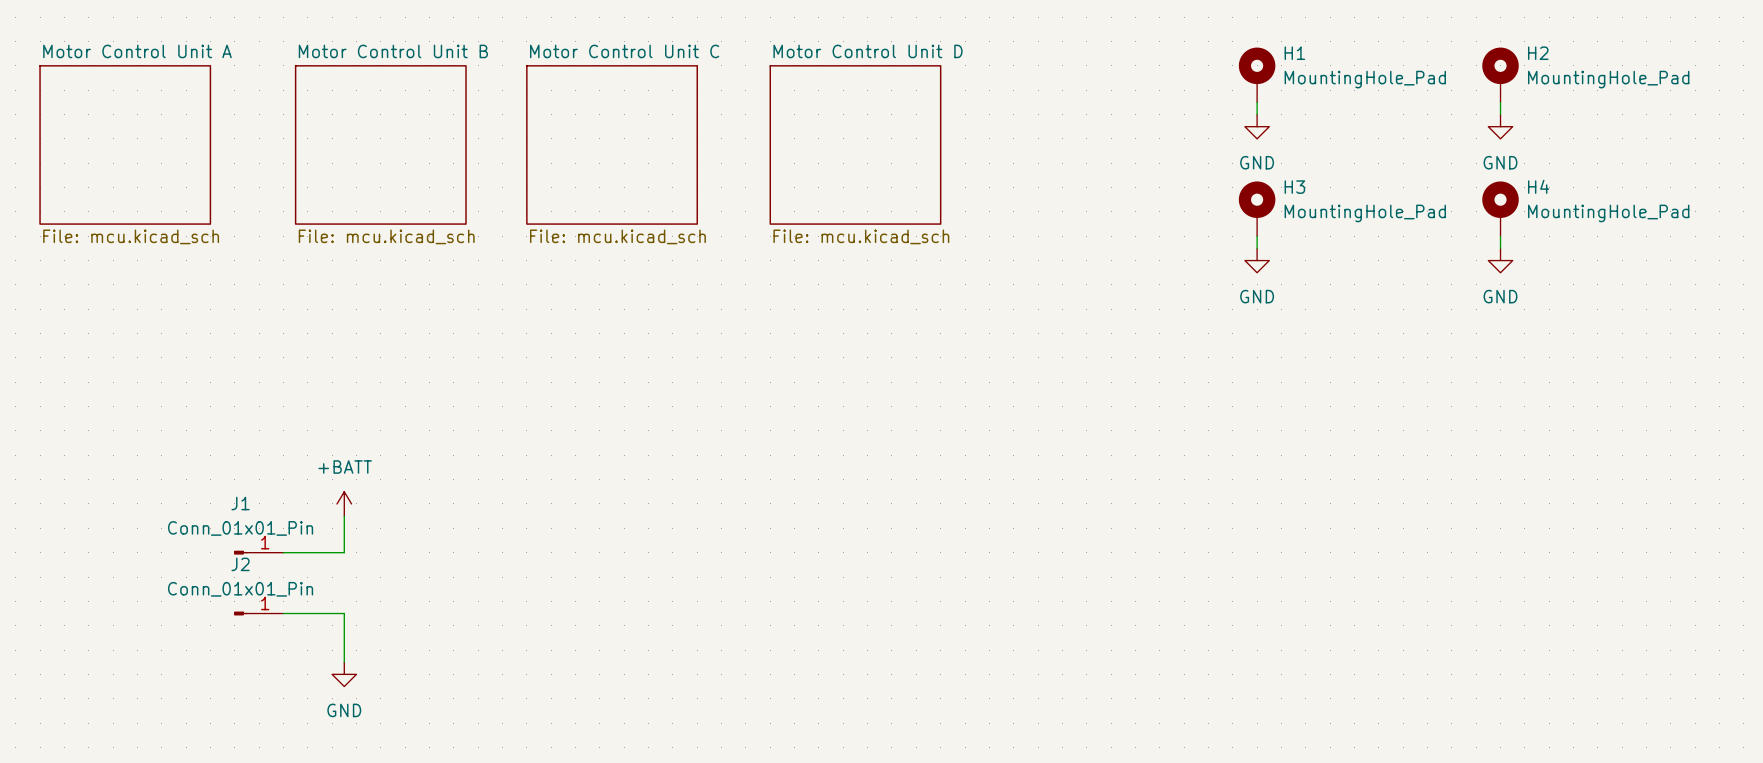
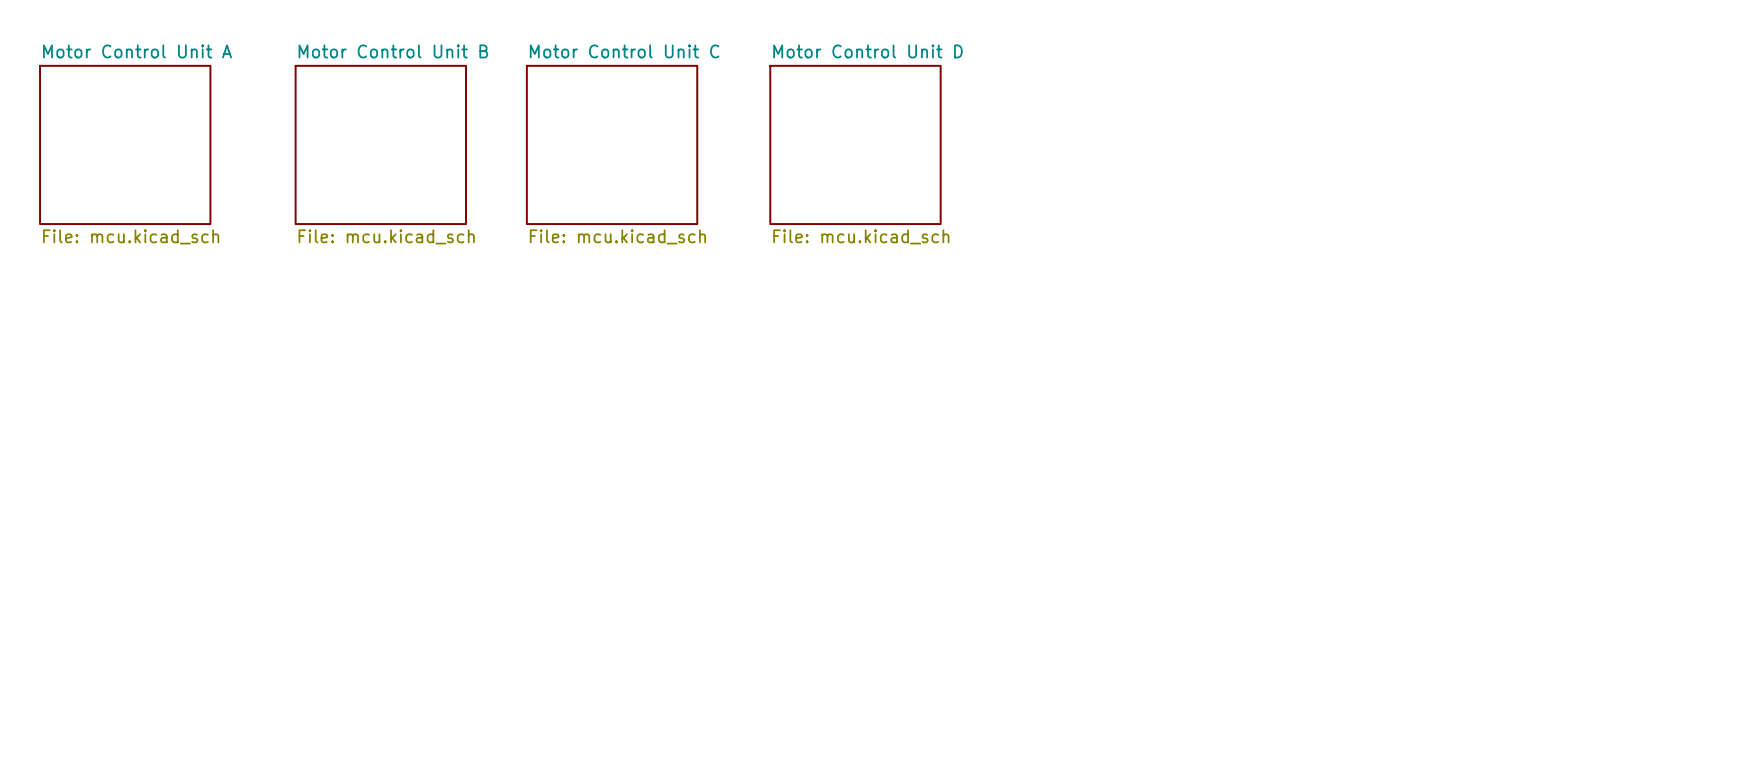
H1: MountingHole_Pad (1257, 74) -> none
H2: MountingHole_Pad (1500, 74) -> none
wire: (1257, 102) (1257, 114) -> none
wire: (1500, 102) (1500, 114) -> none
power symbol: GND (1257, 126) -> none
power symbol: GND (1500, 126) -> none
H3: MountingHole_Pad (1257, 208) -> none
H4: MountingHole_Pad (1500, 208) -> none
wire: (1257, 236) (1257, 248) -> none
wire: (1500, 236) (1500, 248) -> none
power symbol: GND (1257, 260) -> none
power symbol: GND (1500, 260) -> none
power symbol: +BATT (344, 503) -> none
wire: (344, 516) (344, 552) (283, 552) -> none
J1: Conn_01x01_Pin (258, 552) -> none
J2: Conn_01x01_Pin (258, 613) -> none
wire: (283, 613) (344, 613) (344, 662) -> none
power symbol: GND (344, 674) -> none

